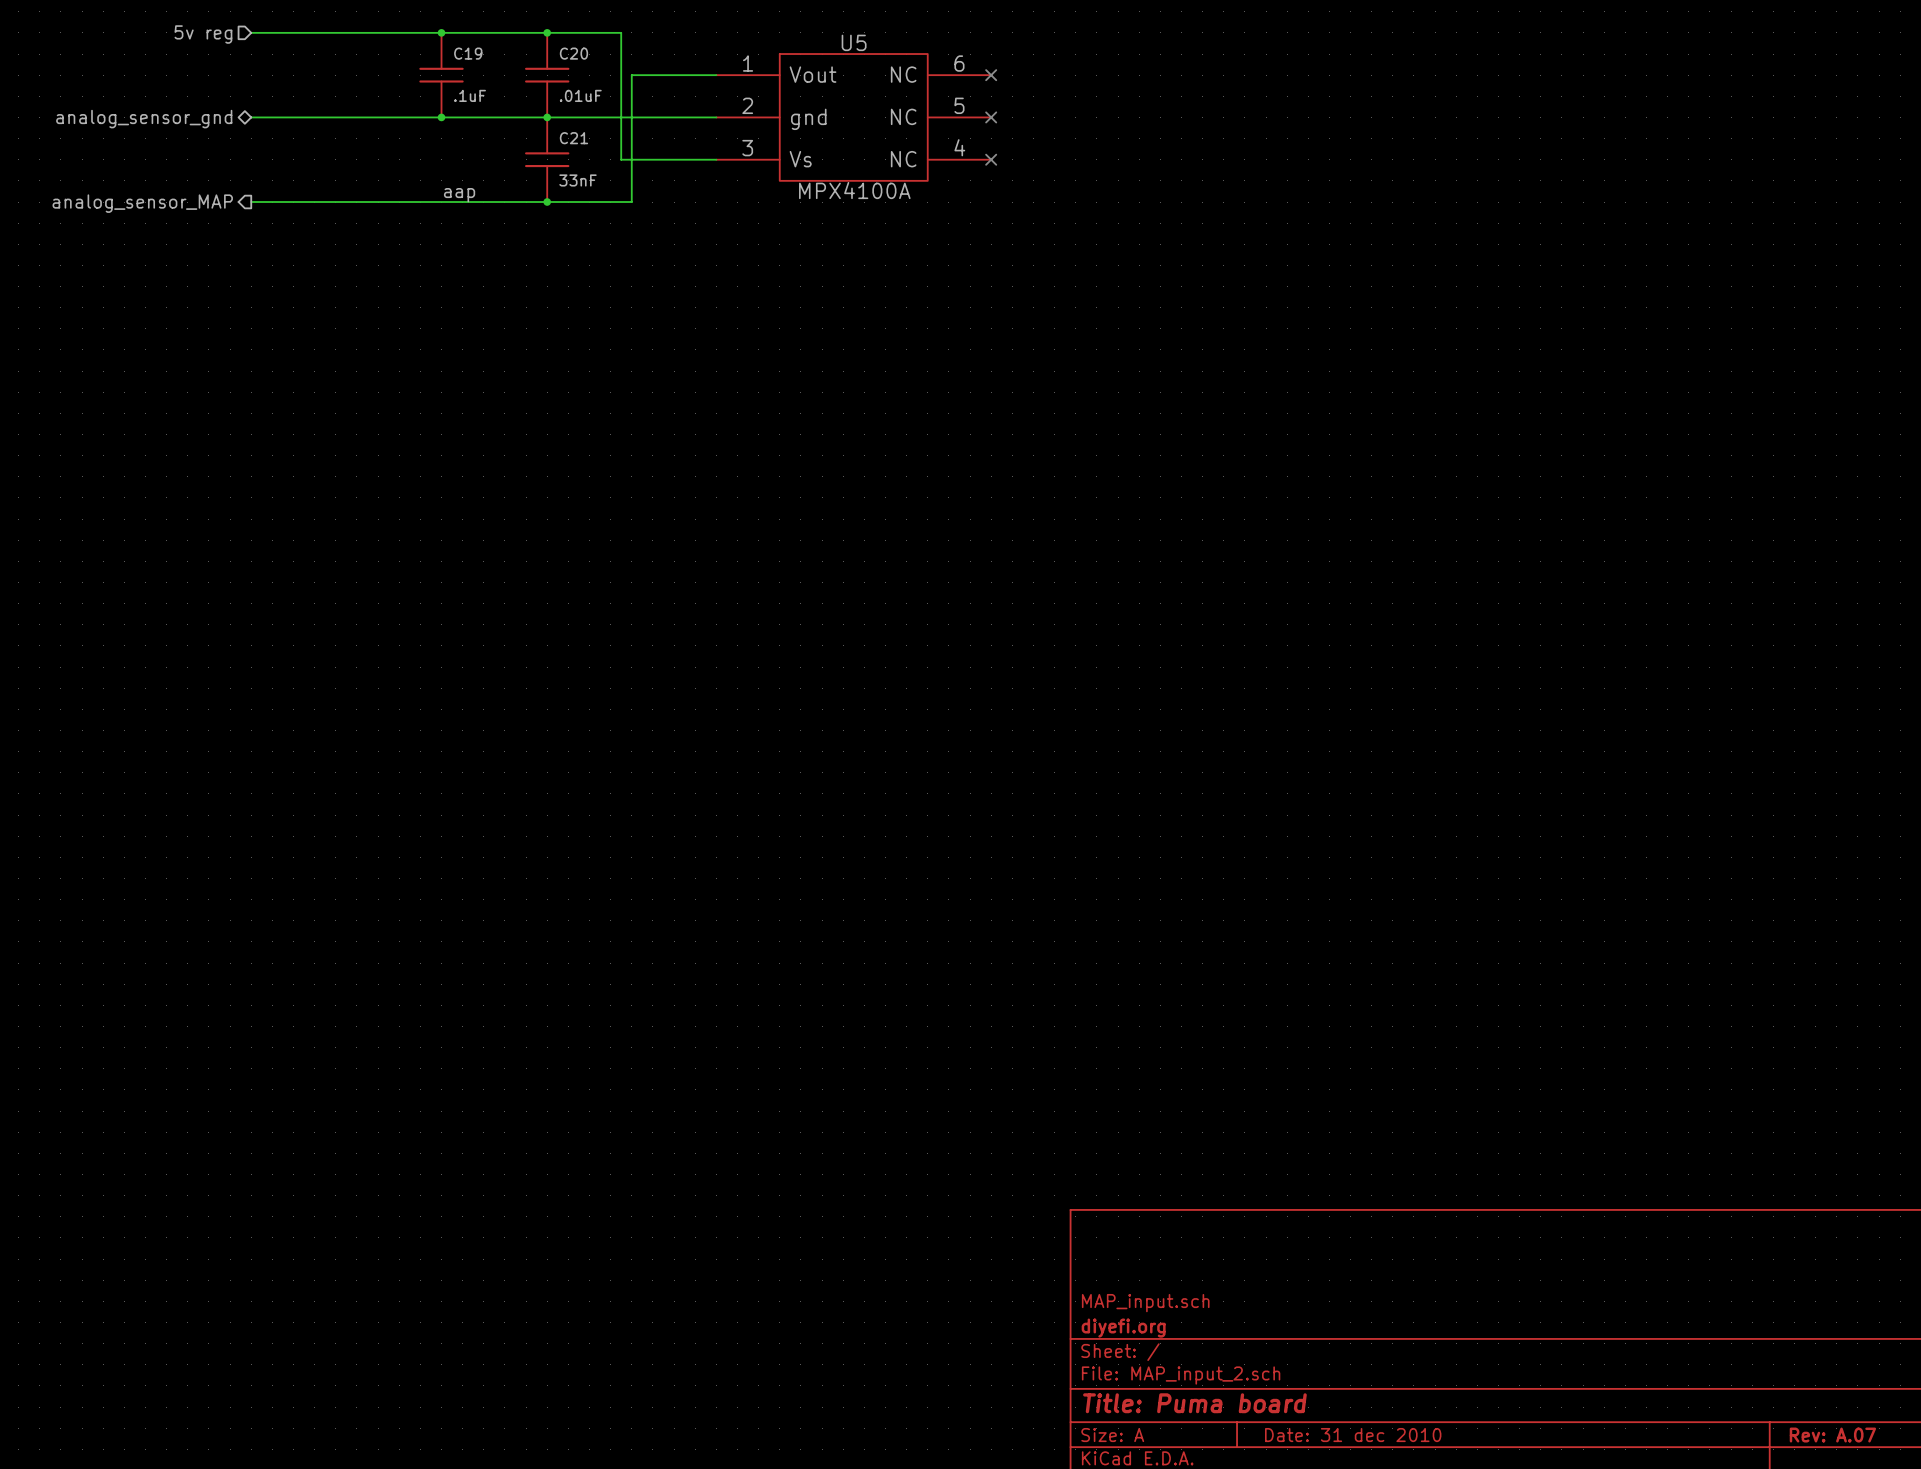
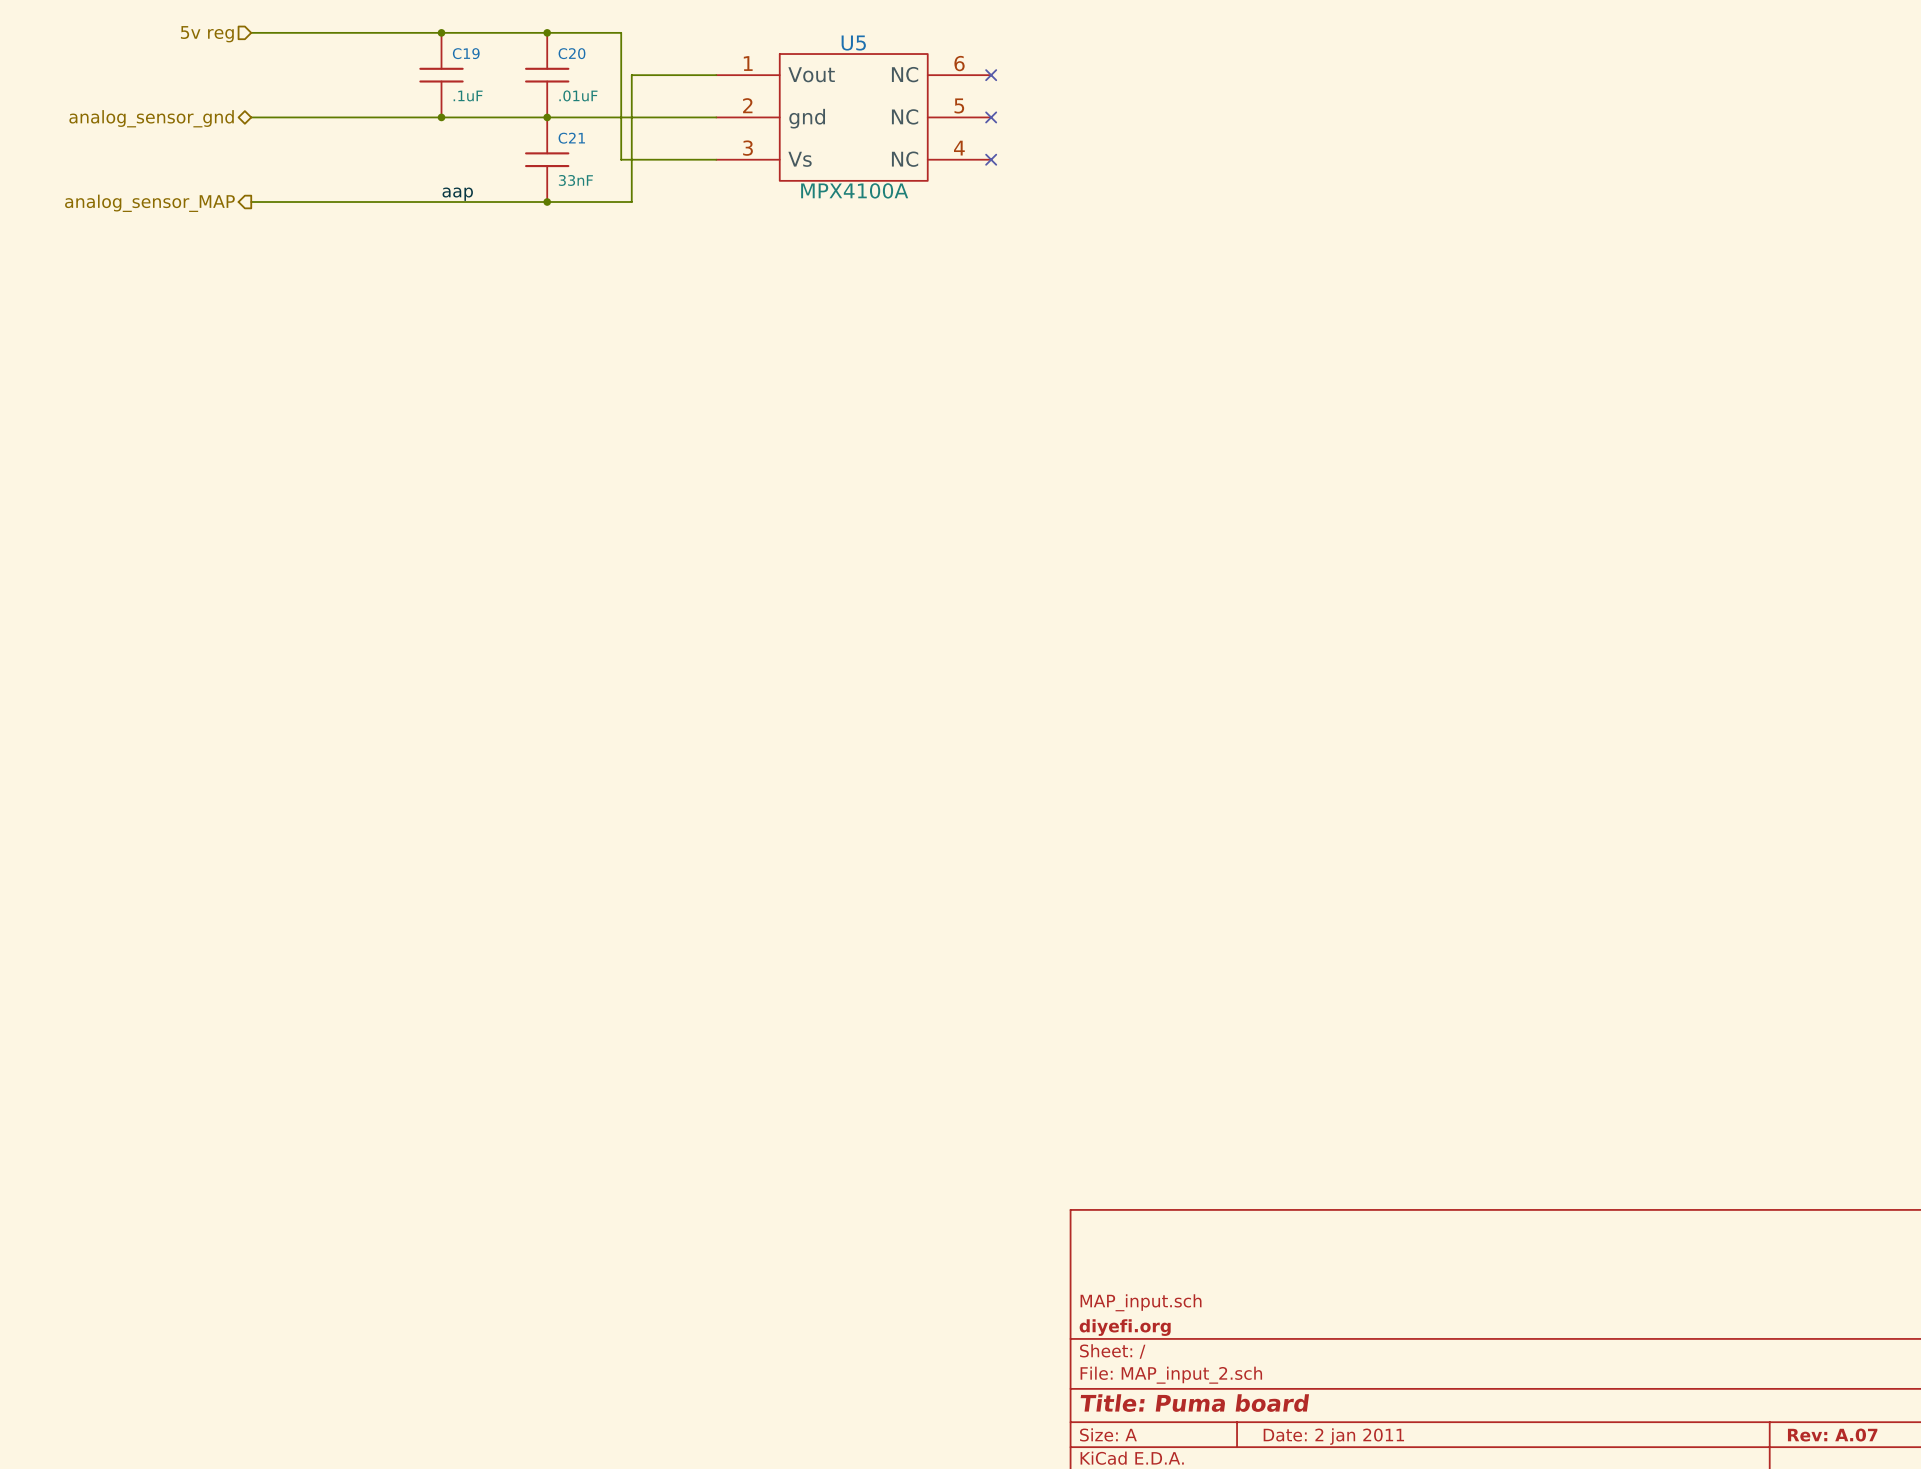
title block: Date: 31 dec 2010 (1353, 1435) -> Date: 2 jan 2011 (1333, 1436)

